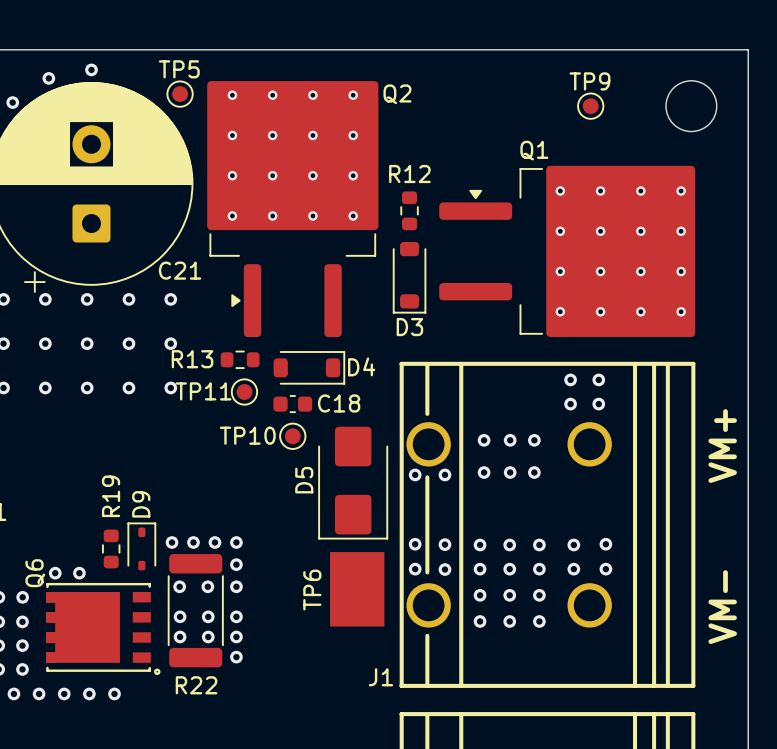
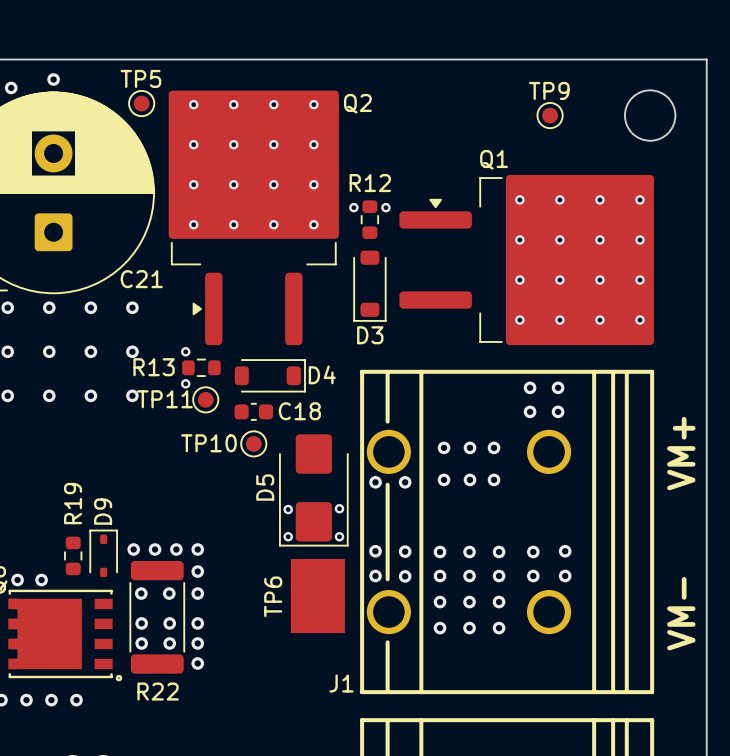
via: none -> (353, 207)
via: none -> (385, 207)
via: none -> (185, 351)
via: none -> (185, 383)
via: none -> (339, 508)
via: none -> (288, 509)
via: none -> (288, 536)
via: none -> (339, 536)

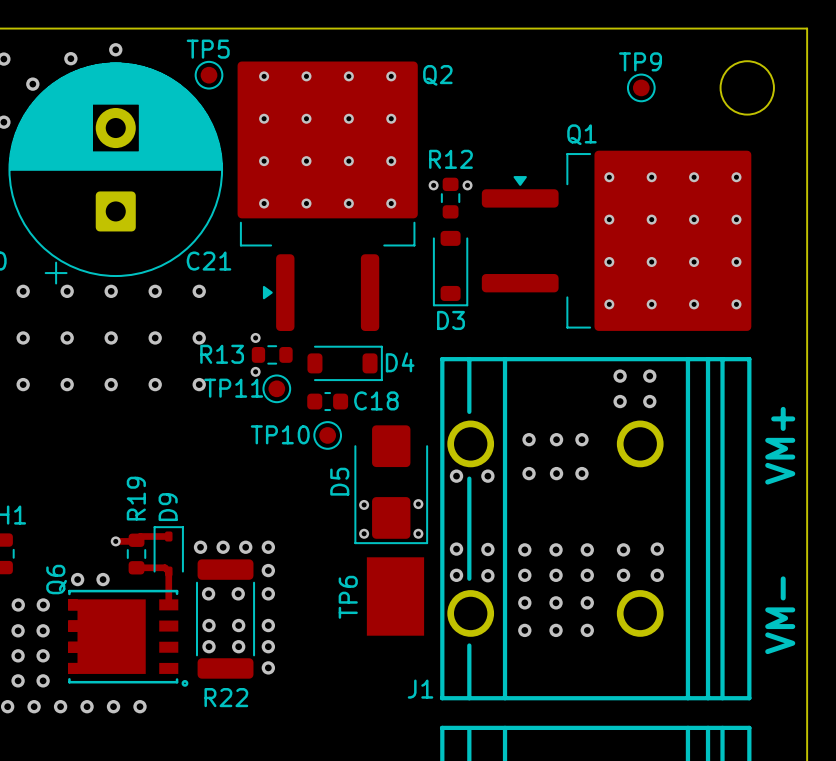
track: none -> (168, 536) (140, 536) (135, 541) (115, 541)
via: none -> (115, 541)
track: none -> (136, 567) (165, 567) (168, 571) (168, 604)

